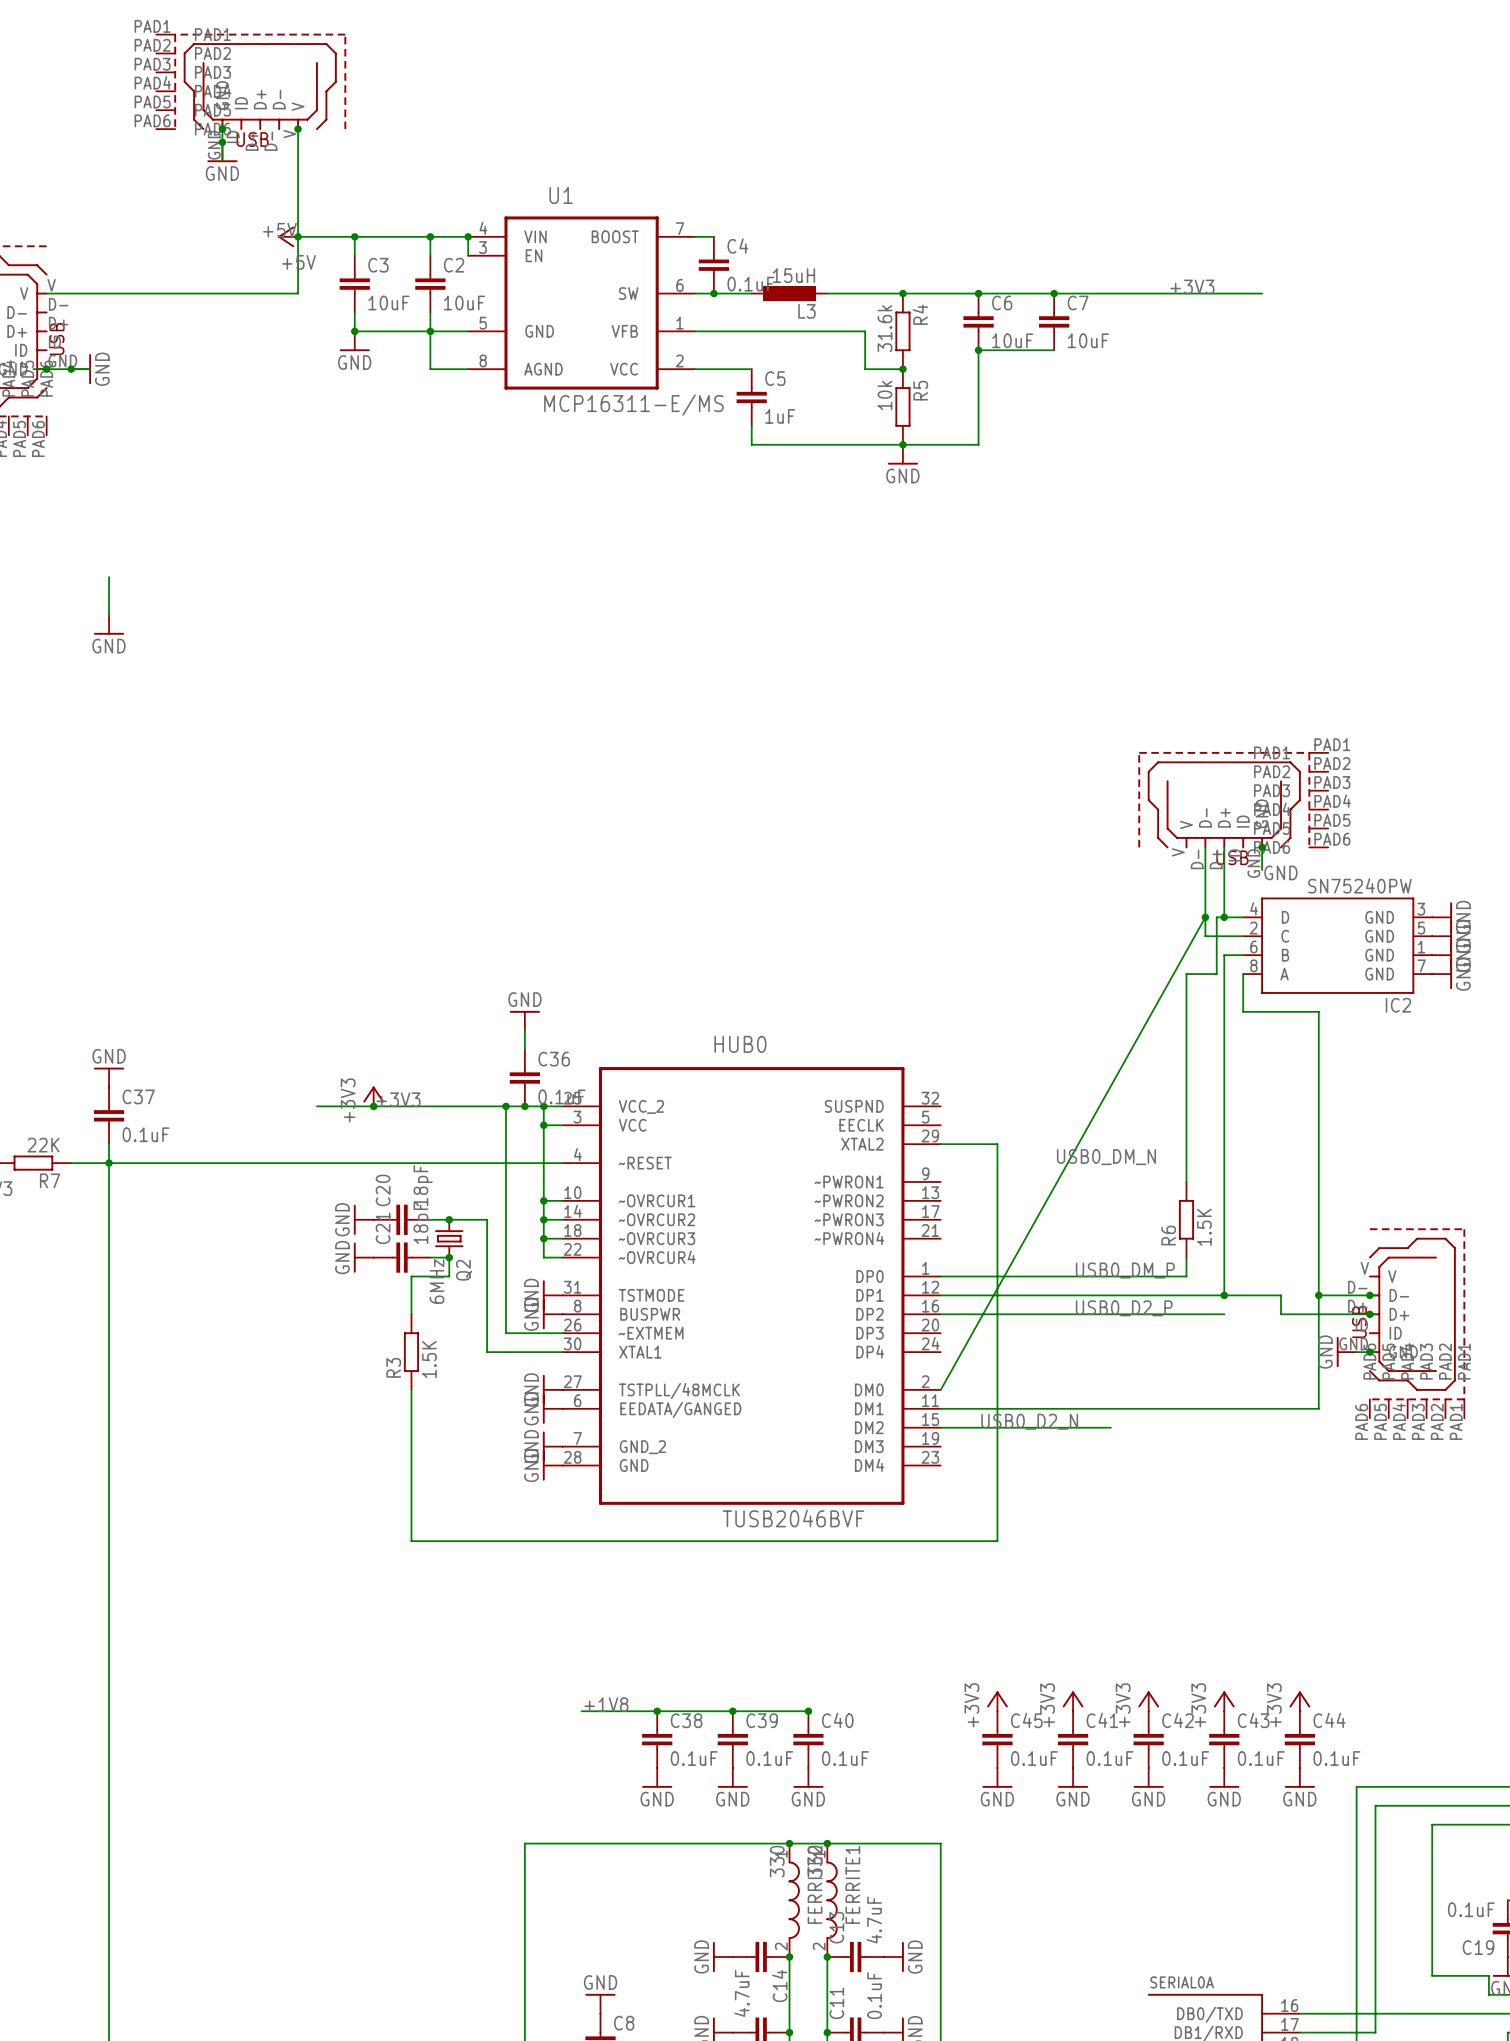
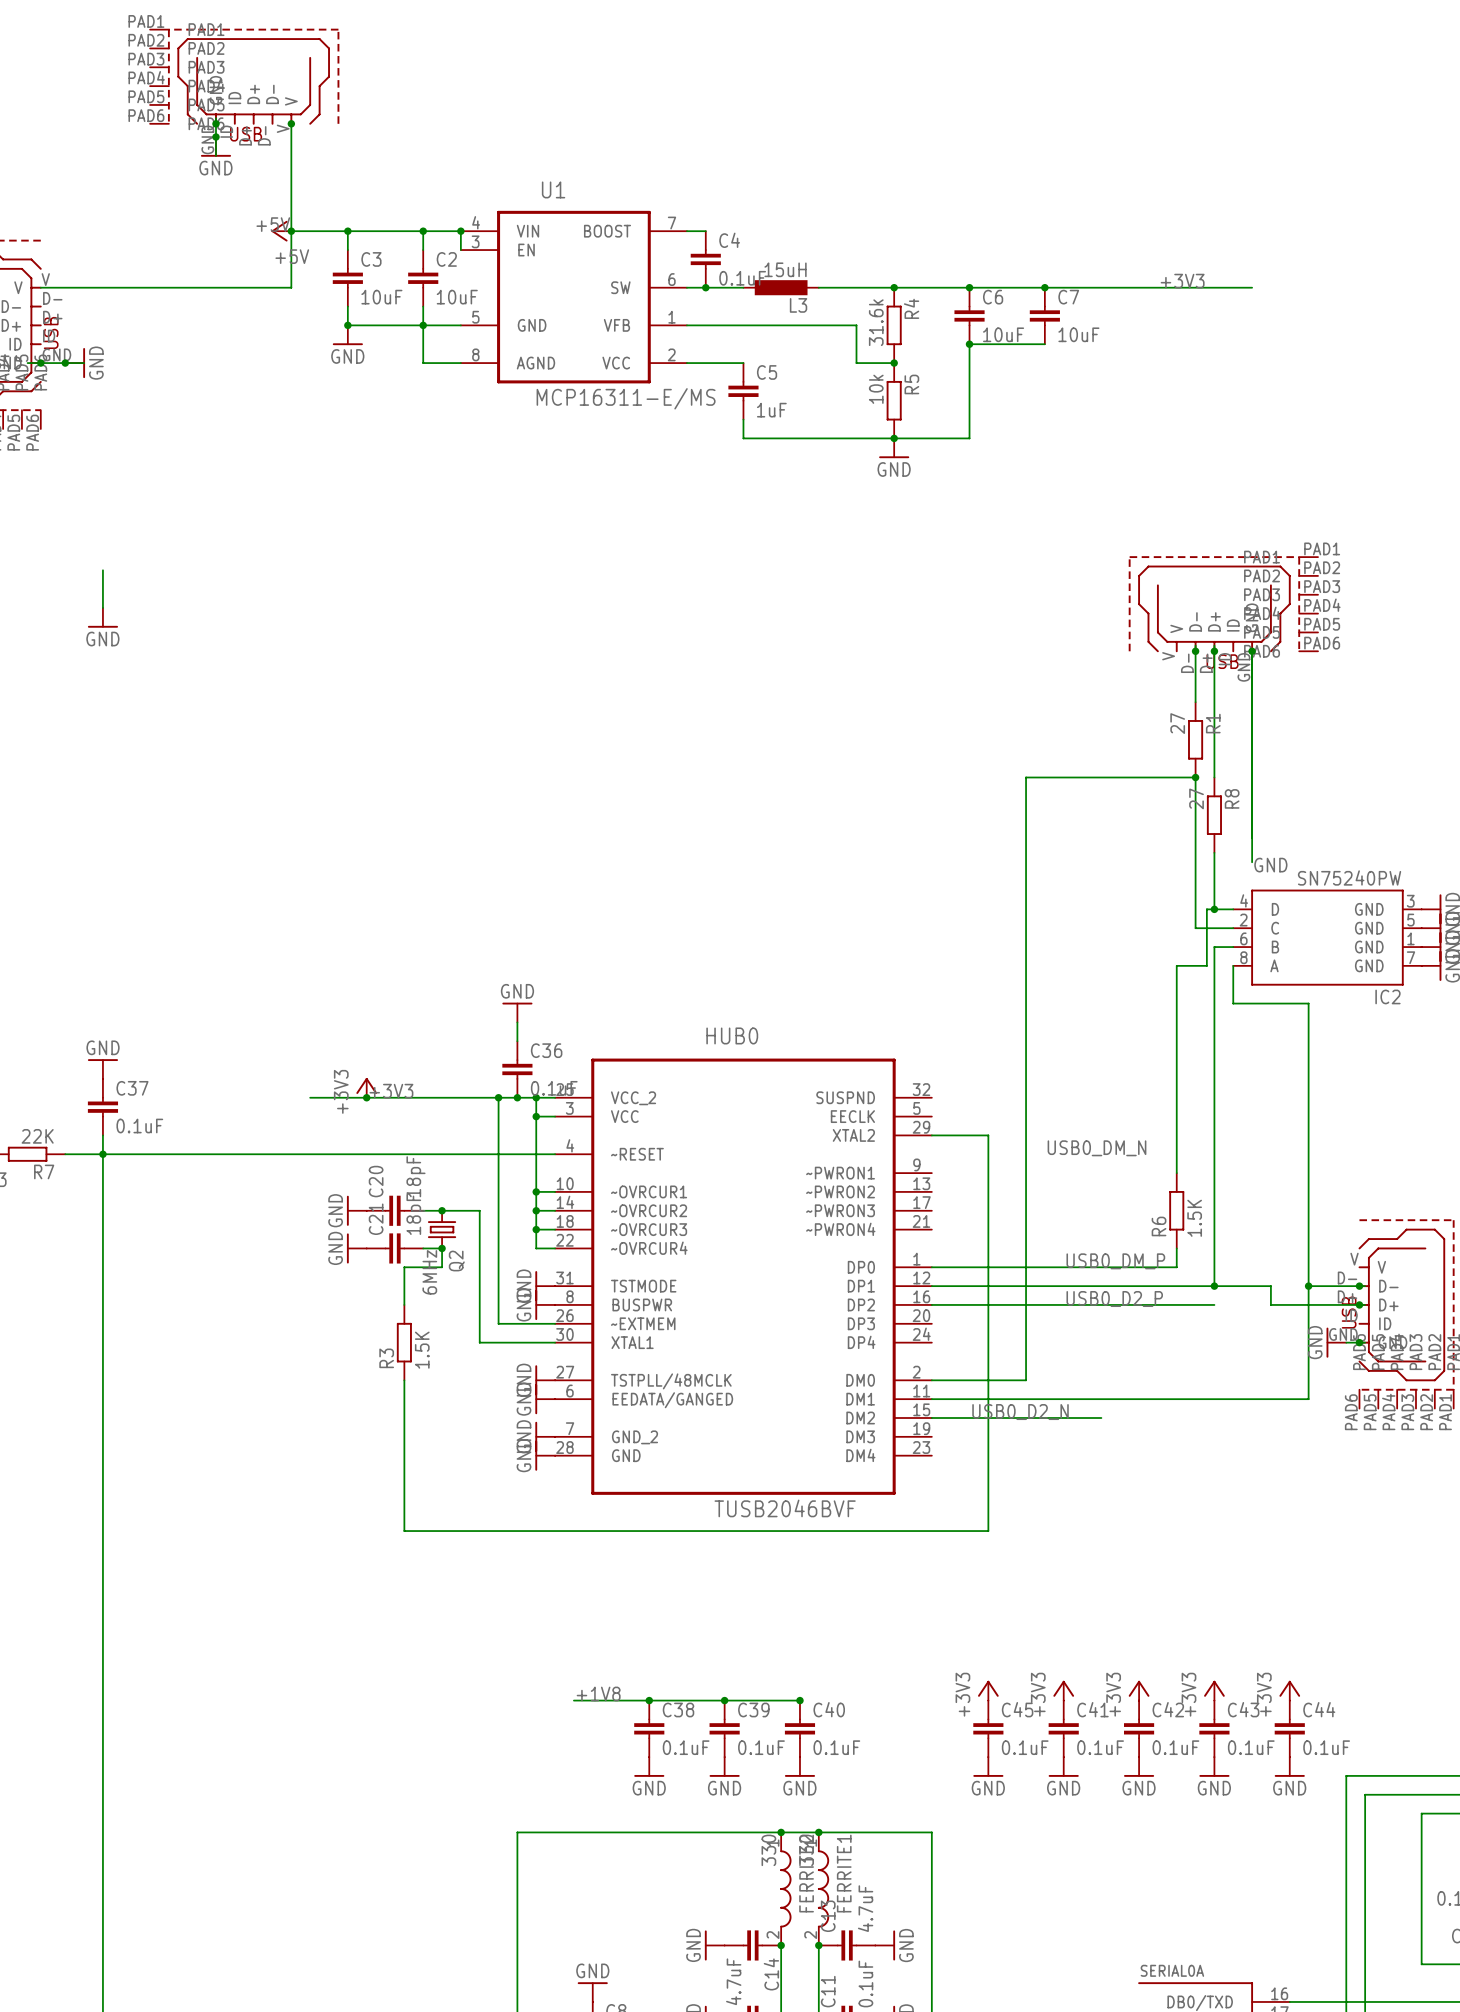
part: none -> (1223, 604)
wire: none -> (1195, 645) (1195, 702)
wire: none -> (1214, 645) (1214, 777)
junction: none -> (1195, 651)
junction: none -> (1214, 651)
wire: none -> (1252, 651) (1252, 837)
junction: none -> (1252, 651)
R1: none -> 27 (1195, 739)
junction: none -> (1195, 777)
part: (1233, 800) -> none
R8: none -> 27 (1214, 815)
junction: (1262, 847) -> none
wire: (1205, 917) (940, 1389) -> (1195, 839) (1195, 777) (1026, 777) (1026, 1380) (931, 1380)
junction: (1205, 917) -> none

